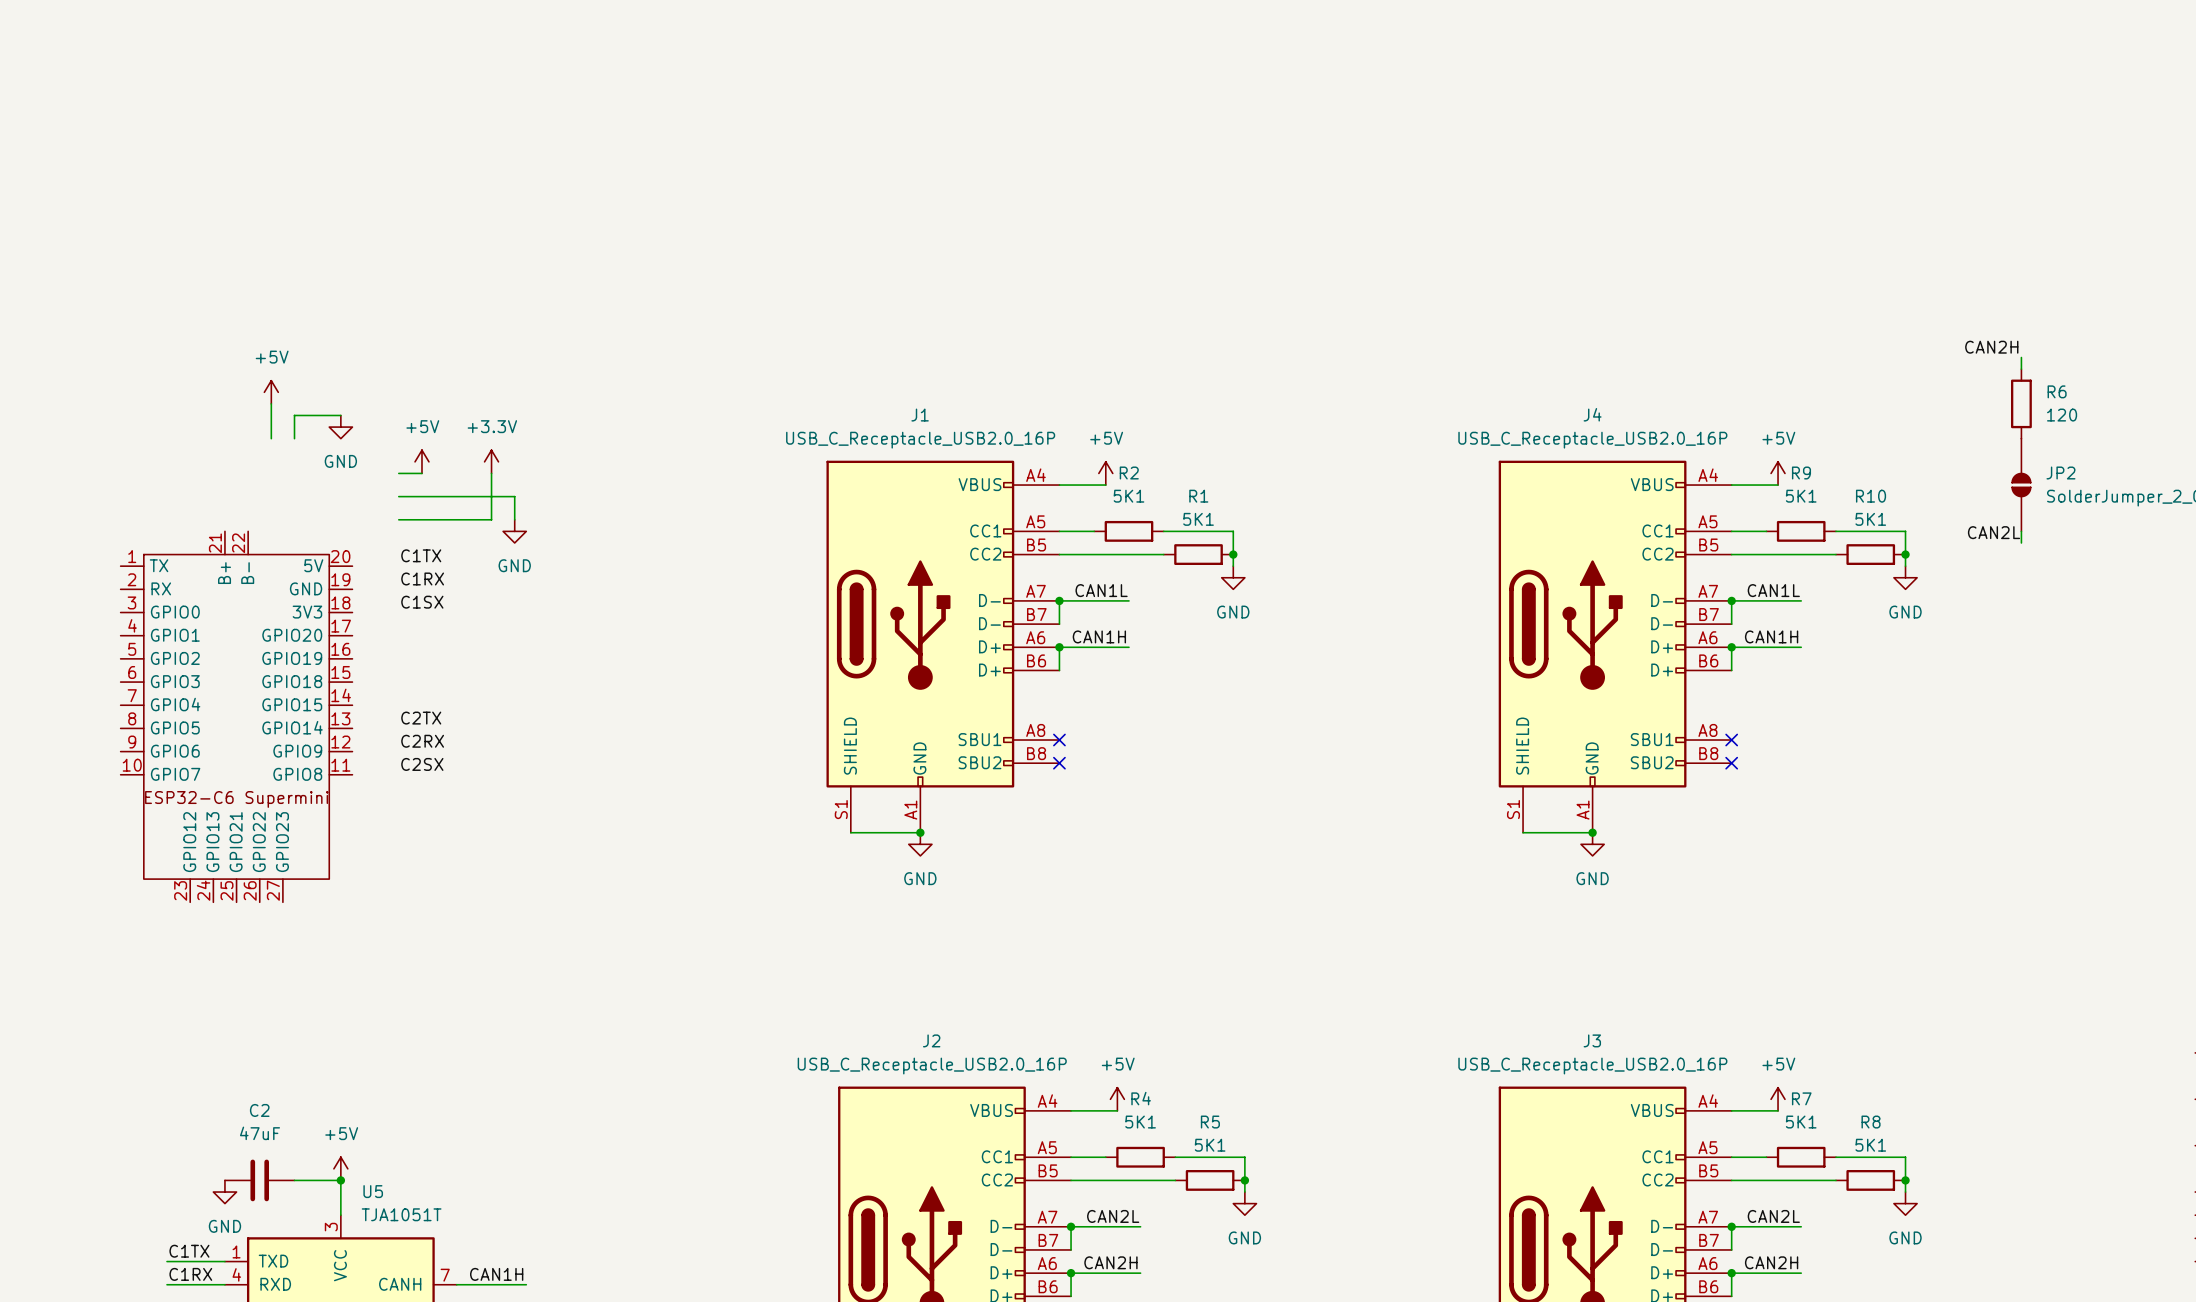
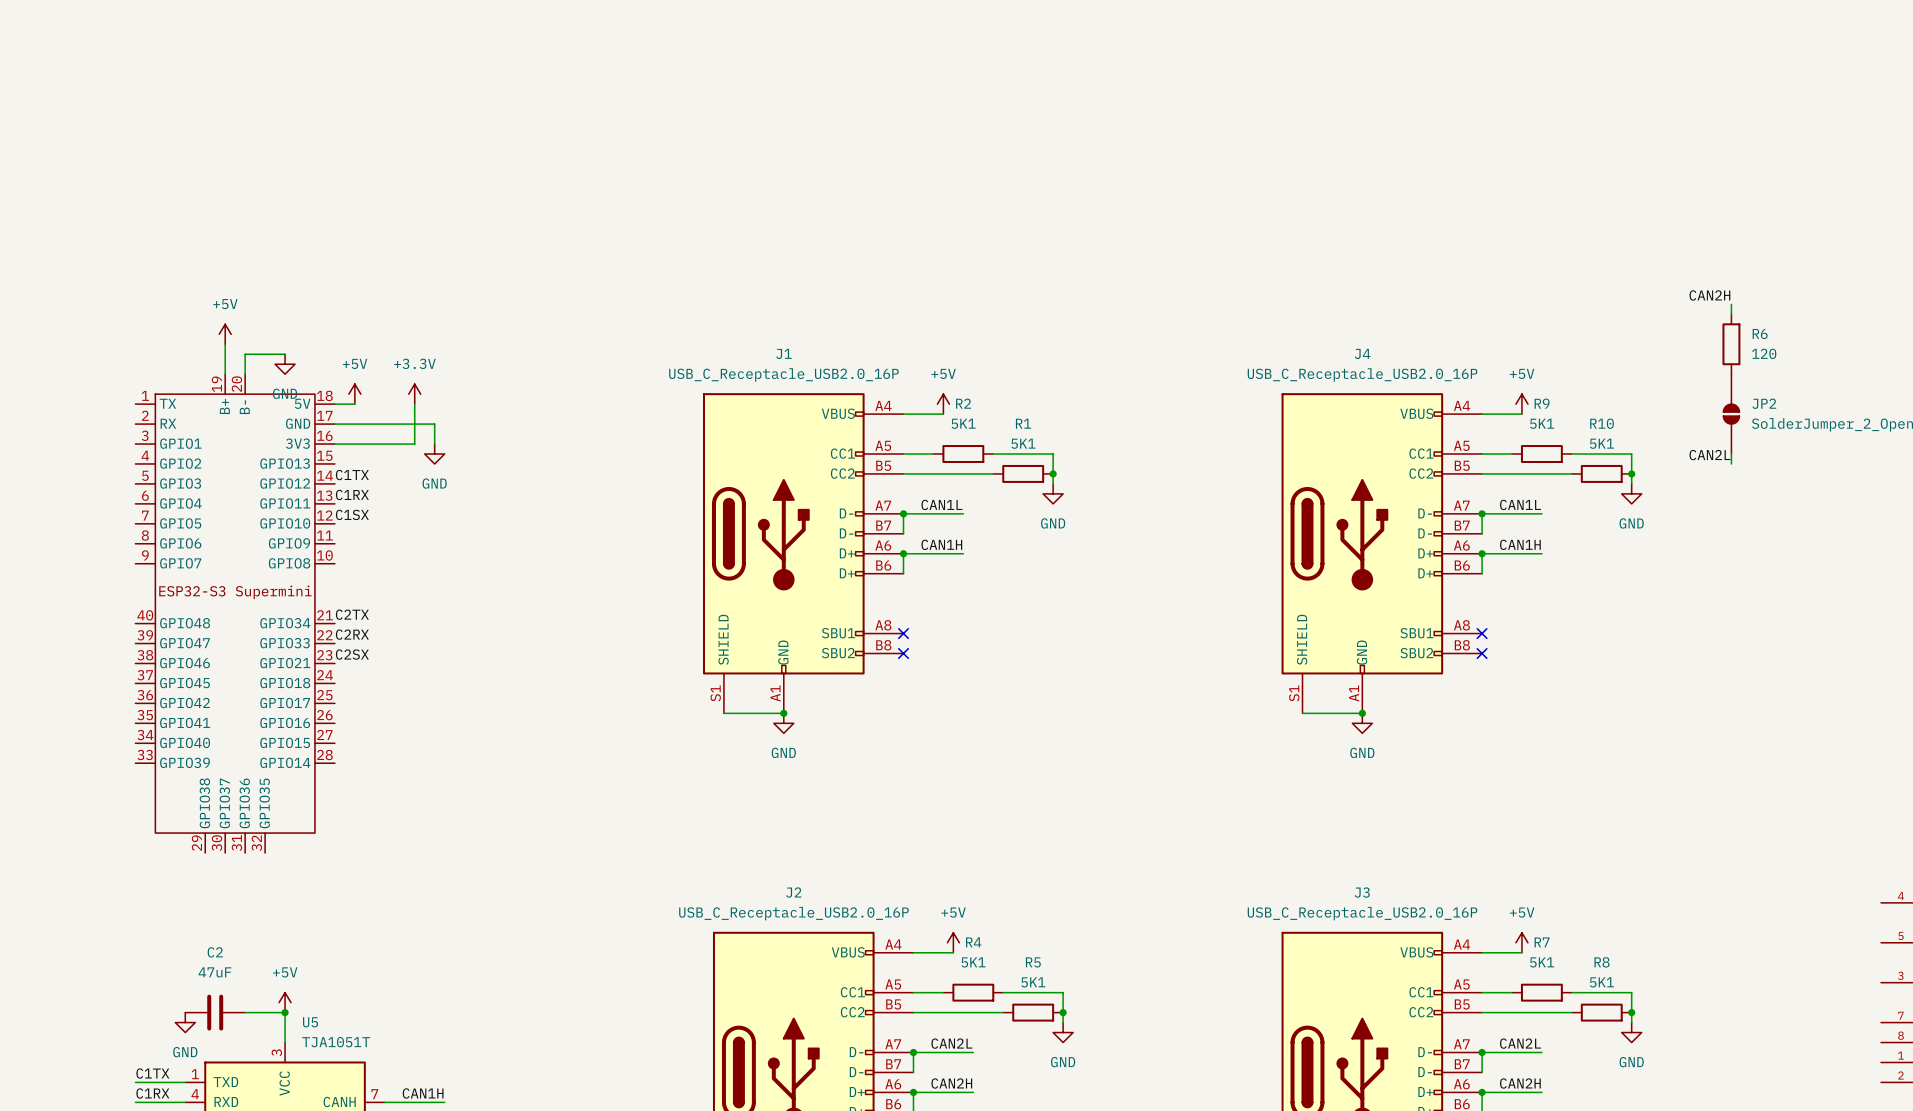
part: (236, 716) -> none
part: none -> (235, 613)

